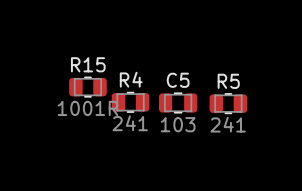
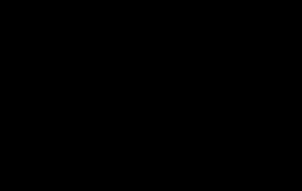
R15: 1001R (87, 87) -> none
R4: 241 (130, 102) -> none
C5: 103 (178, 102) -> none
R5: 241 (228, 103) -> none

